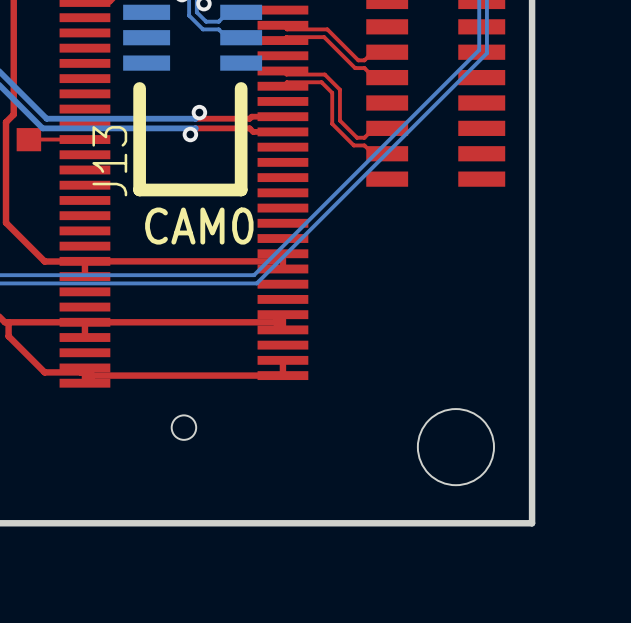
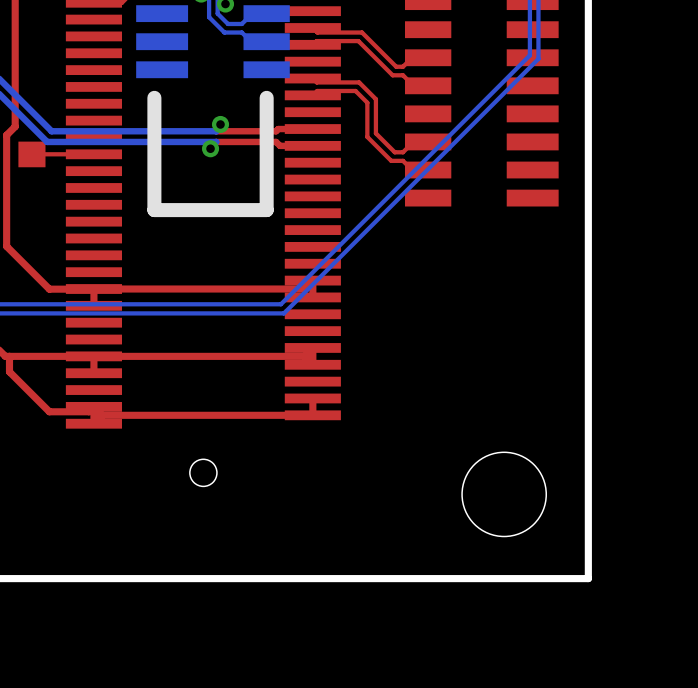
J13 name: J13 (109, 161) -> none
text: CAM0 (199, 226) -> none

